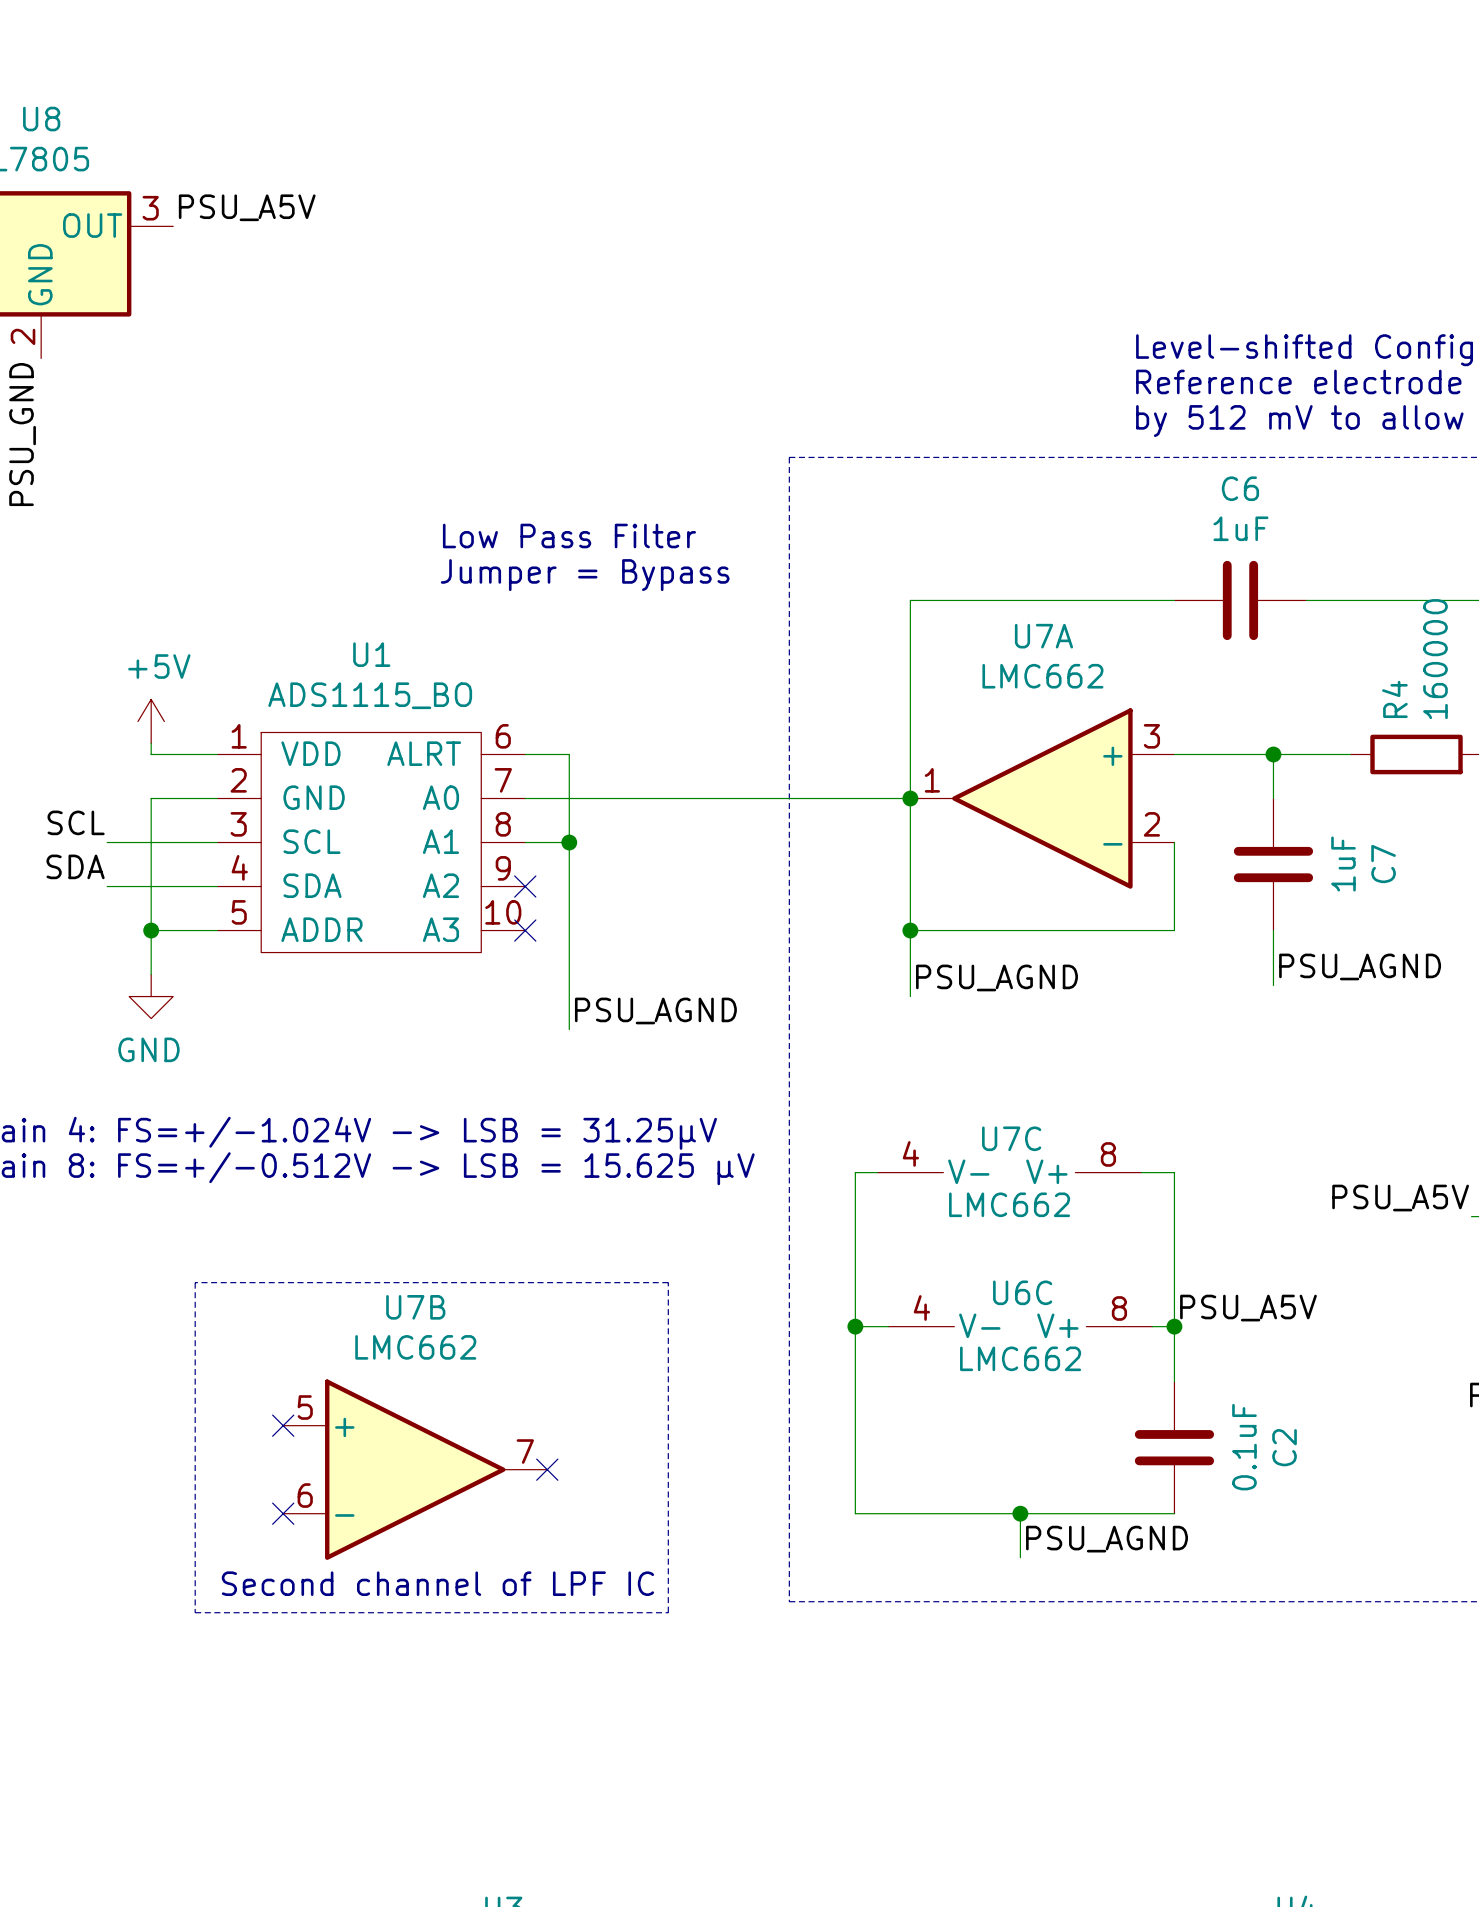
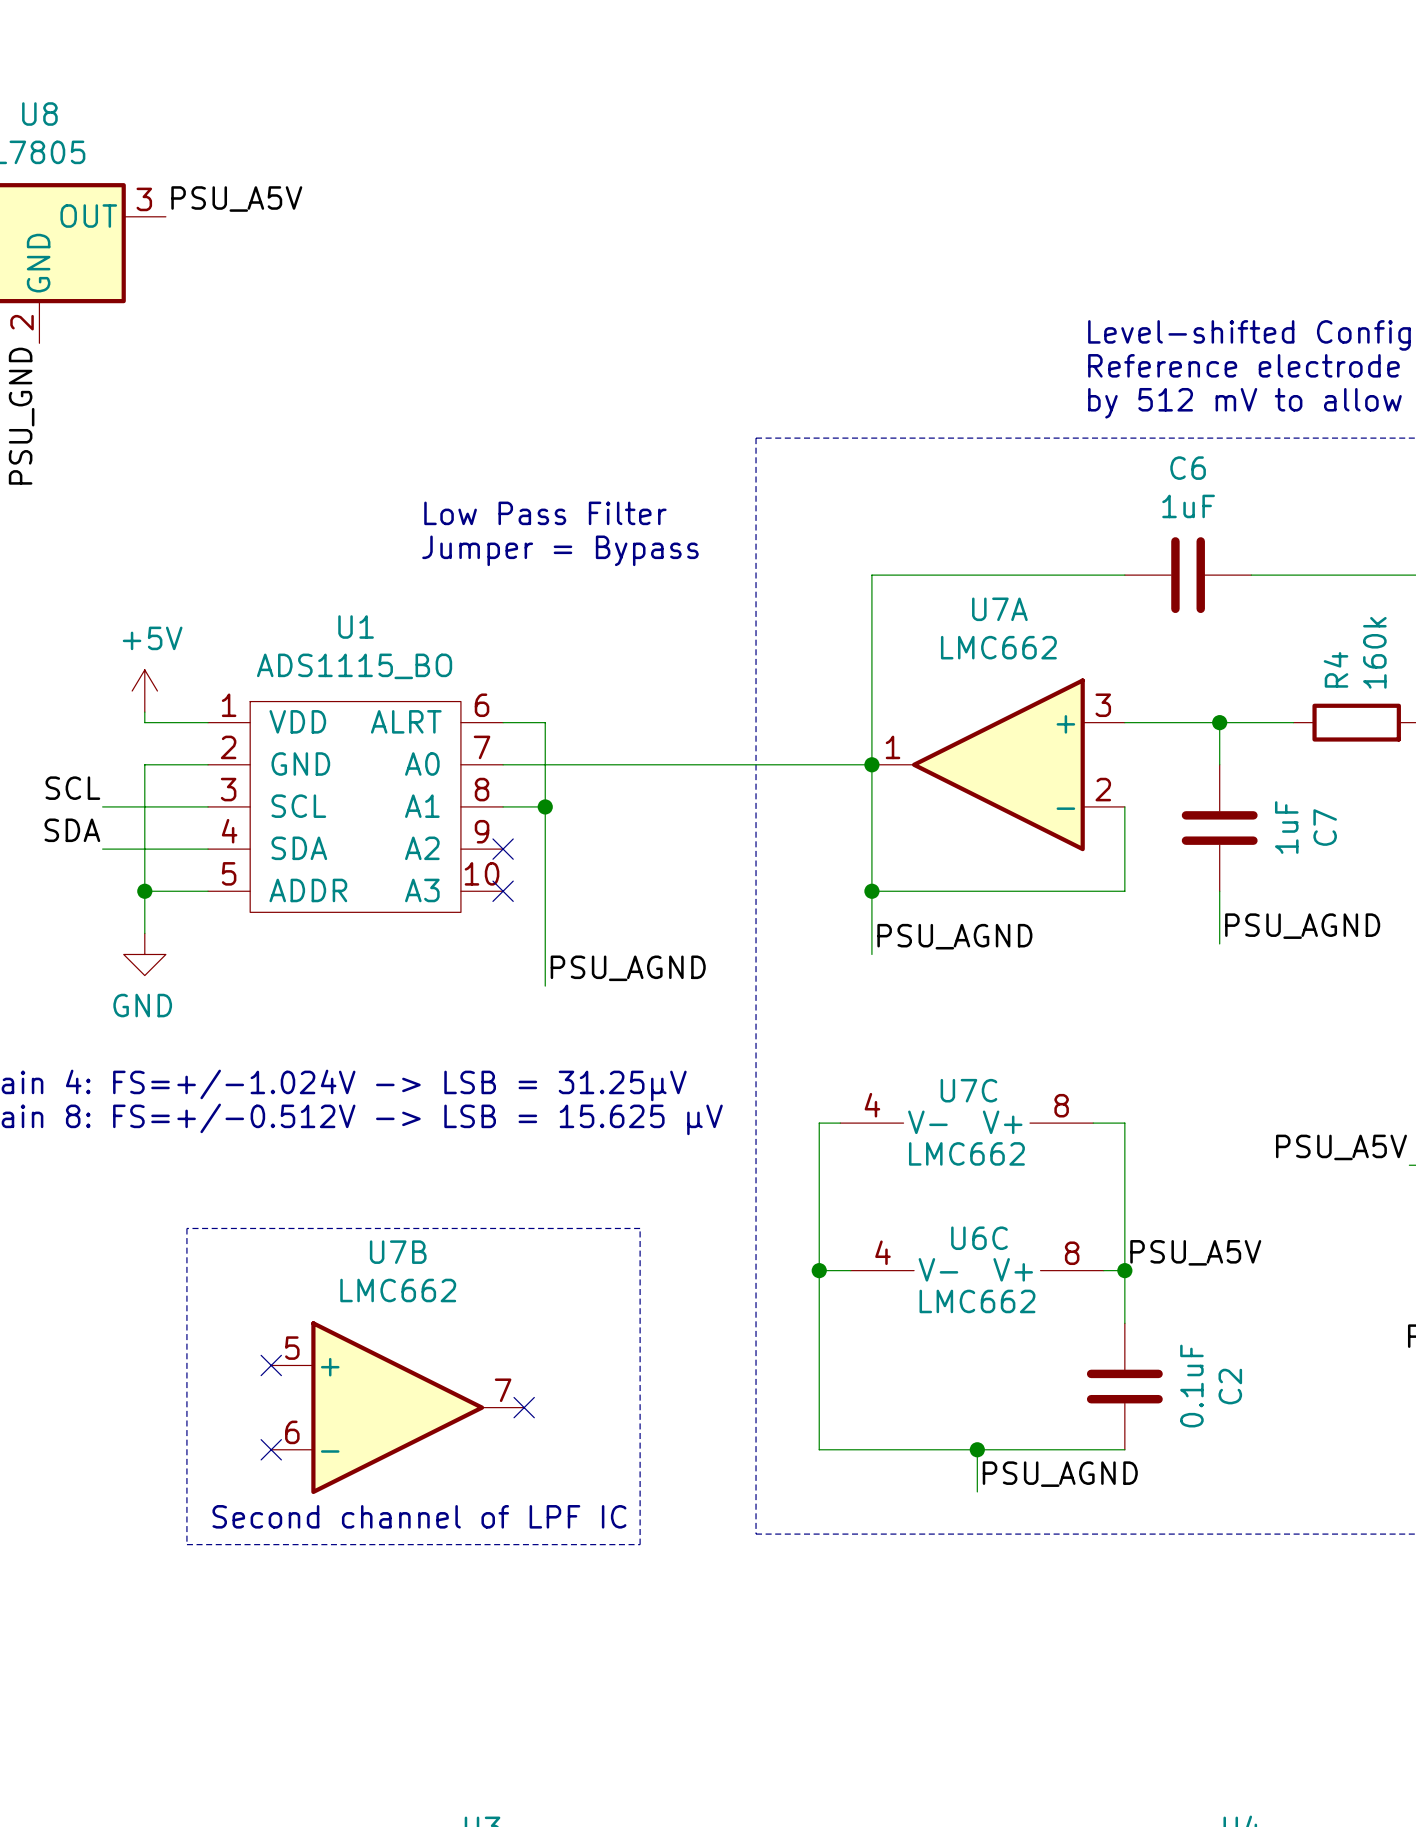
R4 value: 160000 (1435, 659) -> 160k (1374, 652)

